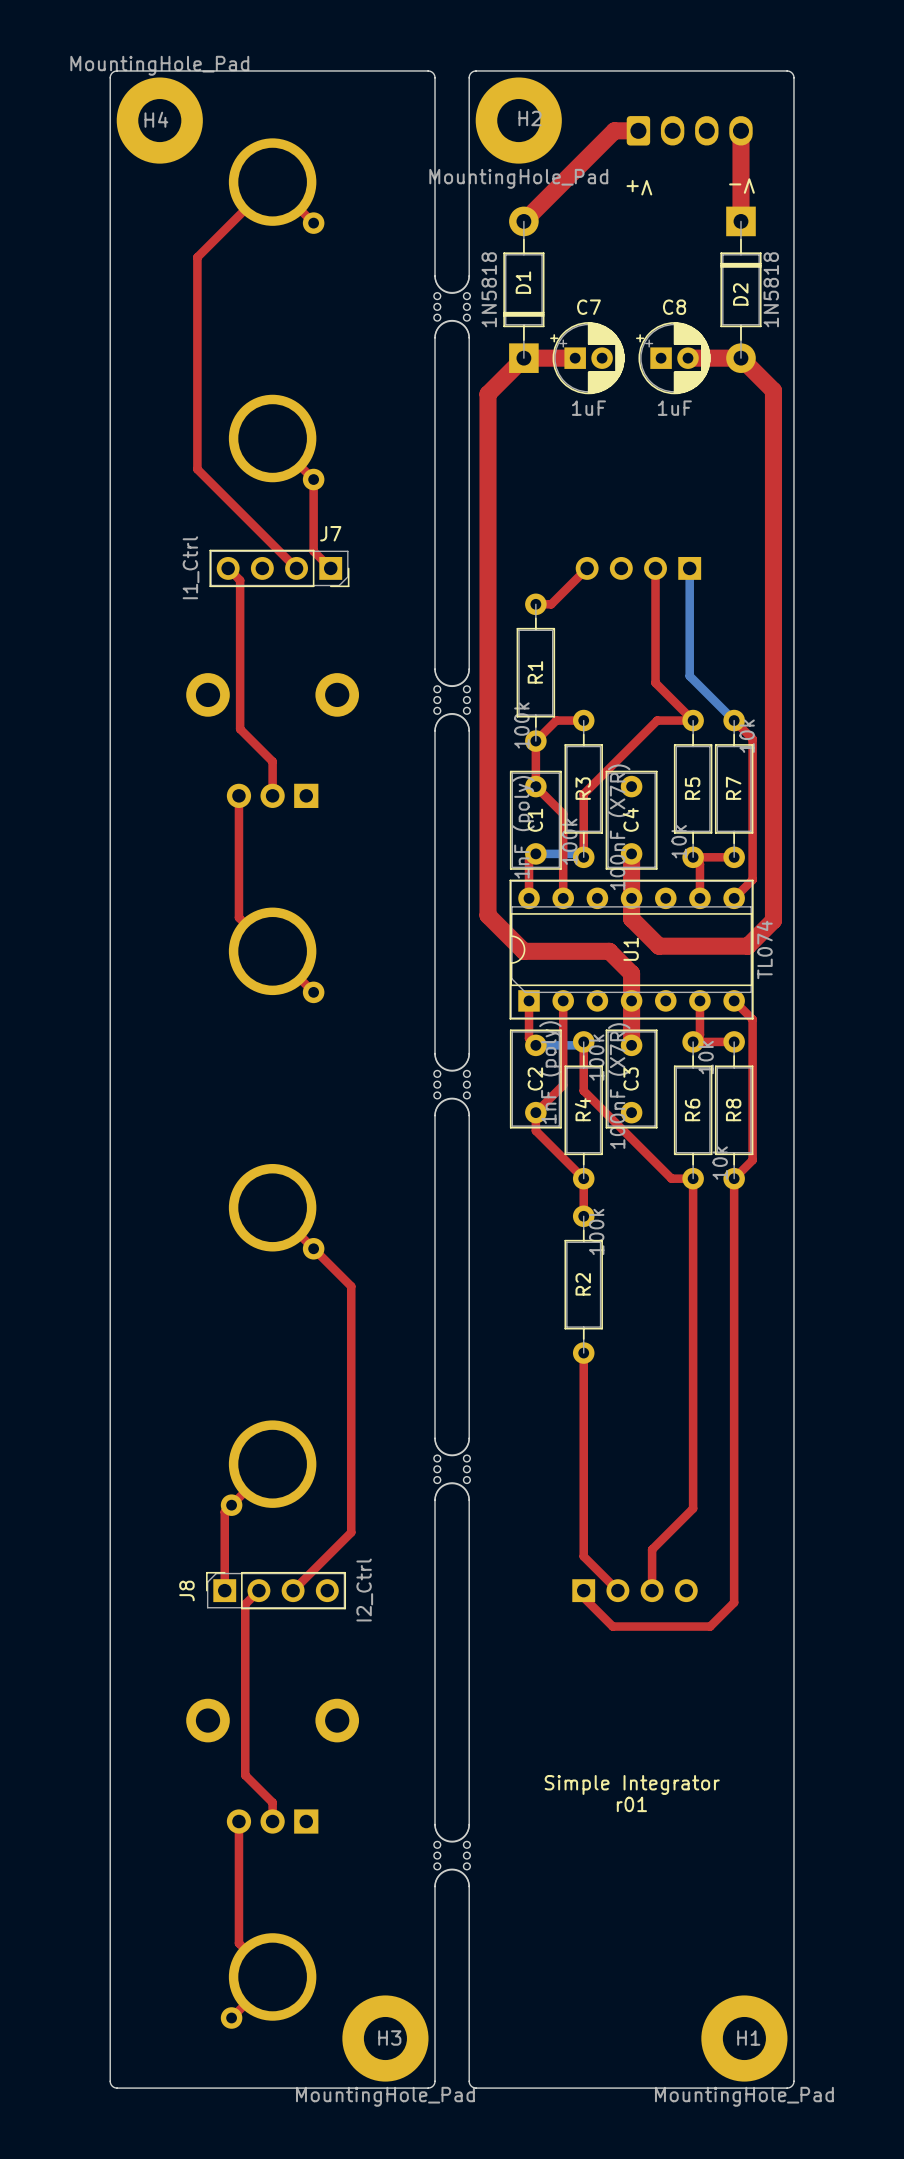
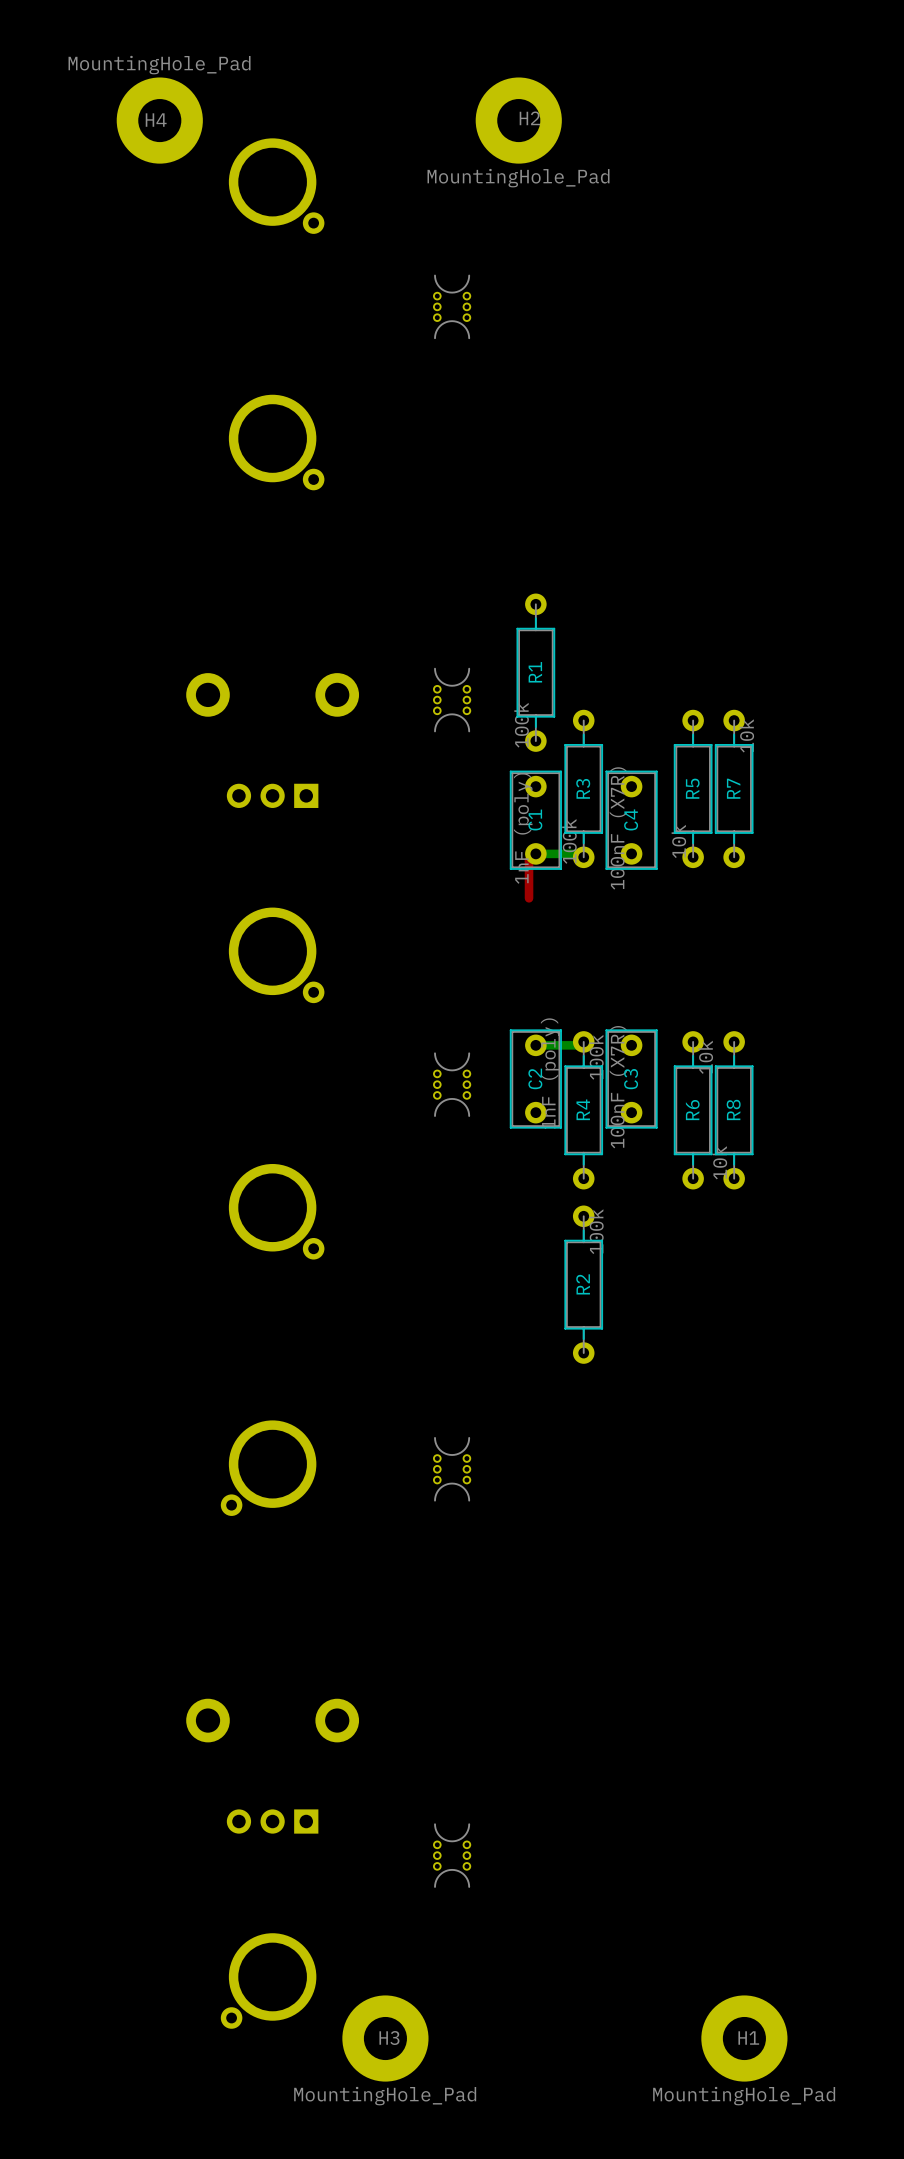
board edge: (117, 70) (431, 71) (435, 77) (435, 278) (440, 288) (452, 293) (463, 288) (469, 278) (469, 77) (472, 71) (787, 70) (793, 76) (793, 2081) (788, 2087) (472, 2087) (469, 2081) (469, 1884) (463, 1873) (452, 1869) (440, 1873) (435, 1884) (435, 2081) (431, 2087) (117, 2088) (110, 2083) (110, 77) (112, 72) (117, 70) -> none
top track: (638, 130) (614, 130) (523, 221) -> none
part: (689, 130) -> none
top track: (740, 130) (740, 221) -> none
top track: (313, 223) (272, 182) (197, 257) (197, 469) (296, 568) -> none
D1: 1N5818 (523, 289) -> none
D2: 1N5818 (740, 289) -> none
board edge: (435, 337) (435, 669) (440, 682) (452, 686) (464, 680) (469, 669) (469, 337) (464, 326) (452, 320) (439, 326) (435, 337) -> none
top track: (575, 358) (523, 358) (488, 394) (488, 915) (523, 951) (609, 951) (631, 973) (631, 1045) -> none
C7: 1uF (587, 358) -> none
C8: 1uF (673, 358) -> none
top track: (688, 358) (740, 358) (773, 390) (773, 920) (747, 946) (658, 946) (631, 918) (631, 853) -> none
top track: (272, 438) (313, 479) (313, 551) (330, 568) -> none
top track: (228, 568) (240, 580) (240, 729) (272, 761) (272, 795) -> none
J7: I1_Ctrl (279, 568) -> none
top track: (587, 568) (551, 604) (535, 604) -> none
part: (638, 568) -> none
top track: (655, 568) (655, 682) (693, 720) (657, 720) (583, 794) (583, 857) -> none
bottom track: (689, 568) (689, 676) (734, 720) -> none
top track: (583, 720) (556, 720) (535, 741) (535, 786) (563, 813) (563, 898) -> none
top track: (734, 720) (752, 739) (752, 879) (734, 898) -> none
board edge: (435, 730) (435, 1053) (440, 1065) (452, 1070) (464, 1065) (469, 1053) (469, 730) (463, 718) (452, 713) (440, 718) (435, 730) -> none
top track: (238, 795) (238, 917) (313, 992) -> none
top track: (734, 857) (693, 857) (699, 864) (699, 898) -> none
U1: TL074 (631, 949) -> none
top track: (529, 1000) (529, 1038) (535, 1045) -> none
top track: (563, 1000) (563, 1085) (535, 1112) (535, 1130) (583, 1178) (583, 1216) -> none
top track: (699, 1000) (699, 1035) (693, 1041) (734, 1041) -> none
top track: (734, 1000) (752, 1019) (752, 1160) (734, 1178) (734, 1602) (710, 1626) (612, 1626) (583, 1597) (583, 1590) -> none
top track: (583, 1041) (583, 1090) (671, 1178) (693, 1178) (693, 1508) (652, 1549) (652, 1590) -> none
board edge: (435, 1115) (435, 1438) (440, 1451) (452, 1455) (464, 1449) (469, 1438) (469, 1115) (464, 1104) (452, 1098) (440, 1102) (435, 1115) -> none
top track: (272, 1207) (351, 1286) (351, 1532) (293, 1590) -> none
top track: (583, 1353) (583, 1556) (617, 1590) -> none
top track: (272, 1464) (224, 1512) (224, 1590) -> none
board edge: (435, 1500) (435, 1824) (440, 1837) (452, 1841) (464, 1836) (469, 1824) (469, 1500) (464, 1487) (452, 1482) (440, 1487) (435, 1500) -> none
top track: (258, 1590) (245, 1604) (245, 1775) (272, 1802) (272, 1821) -> none
J8: I2_Ctrl (276, 1590) -> none
part: (635, 1590) -> none
text: Simple Integrator (632, 1784) -> none
text: r01 (631, 1804) -> none
top track: (238, 1821) (238, 1943) (272, 1976) (231, 2018) -> none

